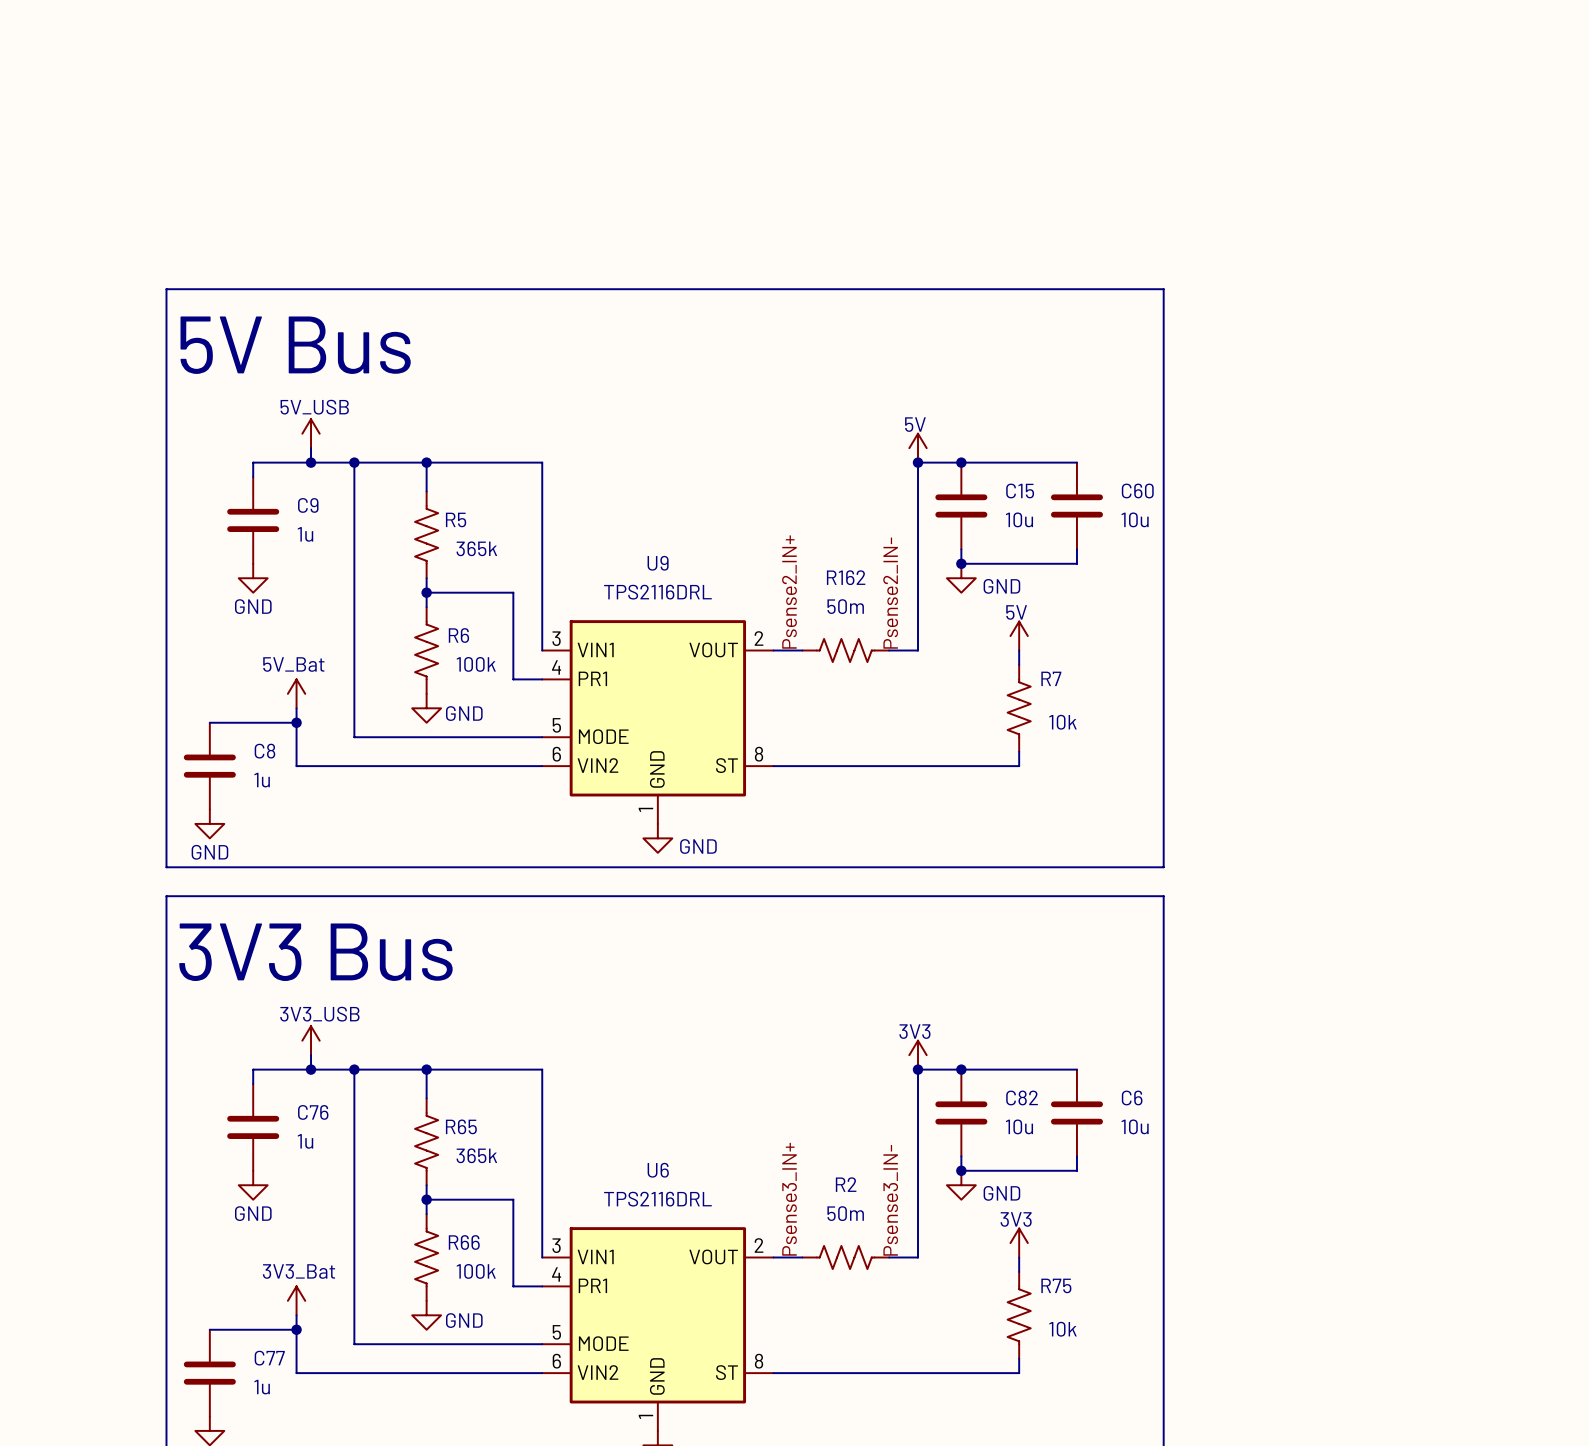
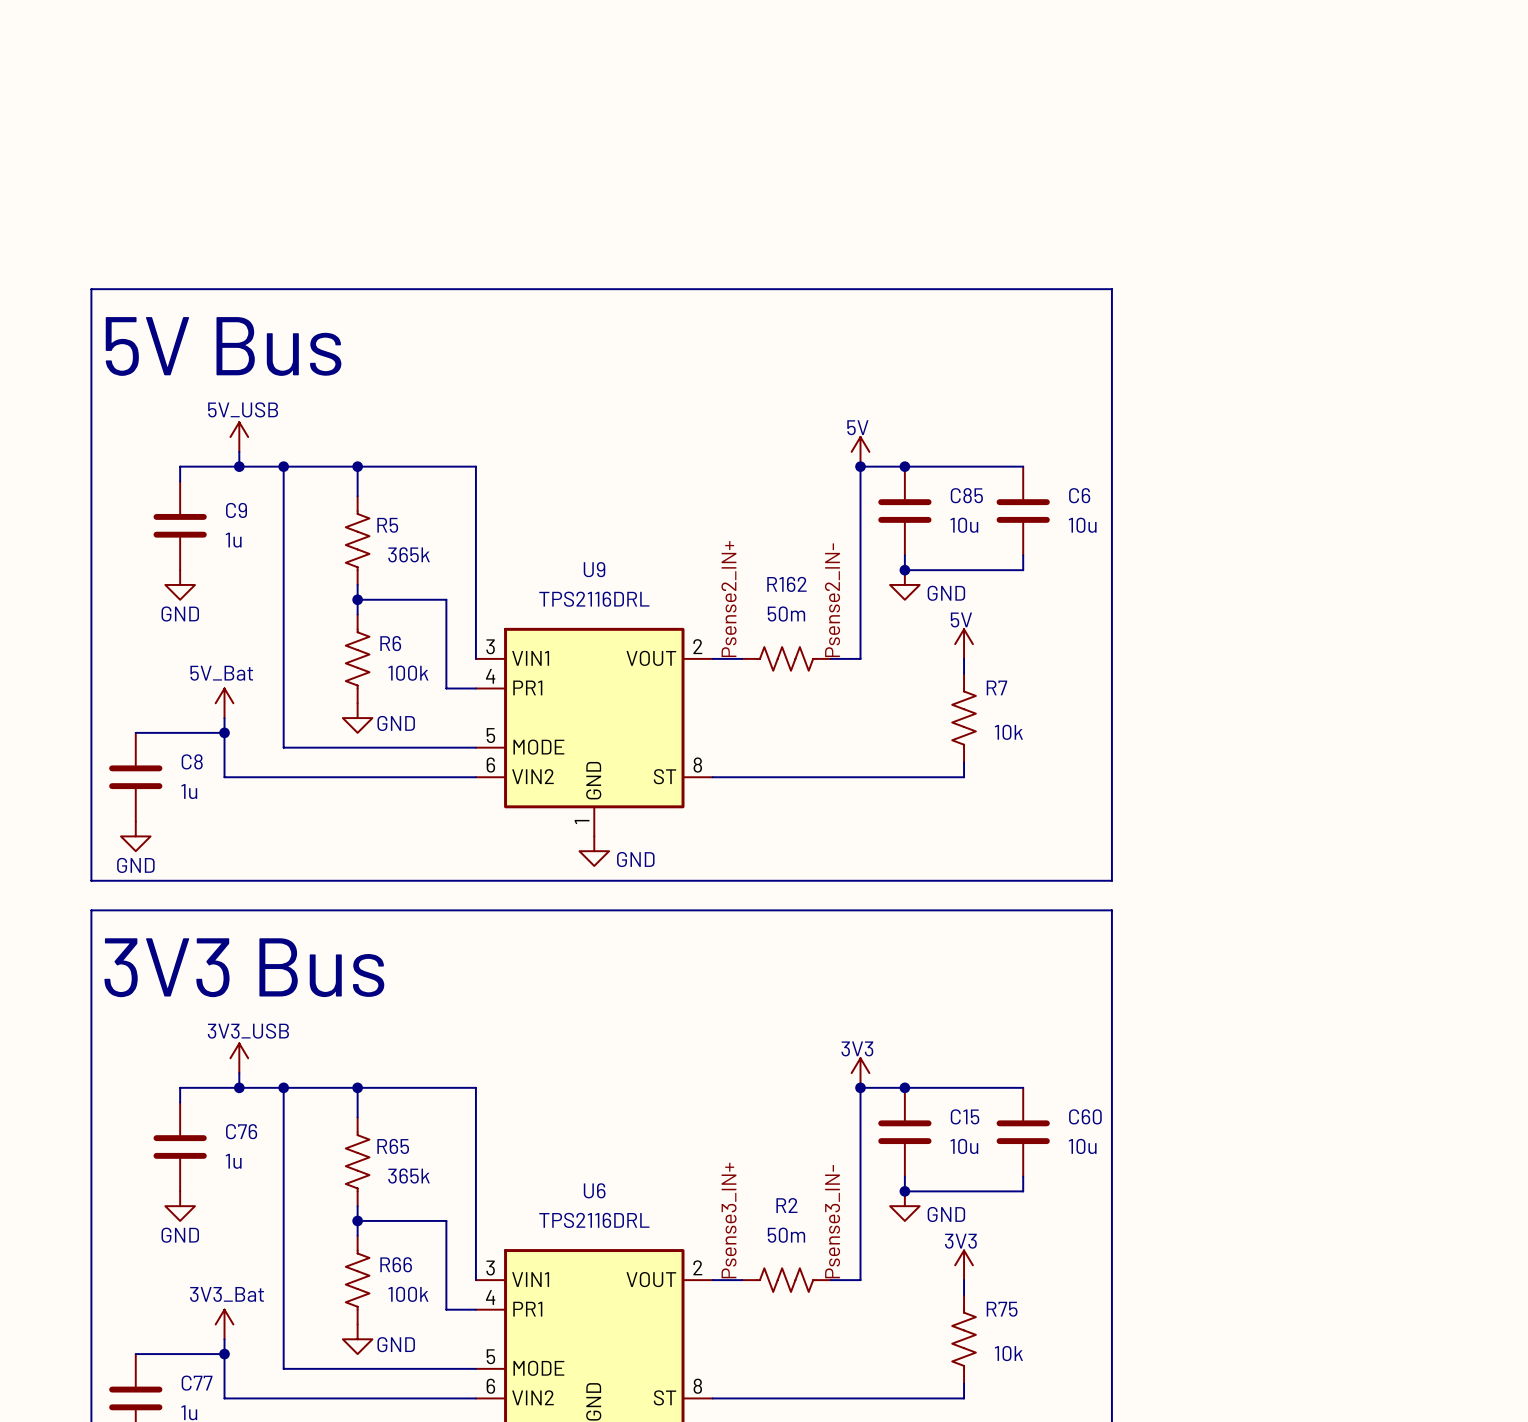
C15 name: C15 (1020, 491) -> C85 (966, 495)
C60 name: C60 (1137, 491) -> C6 (1079, 495)
C82 name: C82 (1022, 1097) -> C15 (965, 1116)
C6 name: C6 (1132, 1097) -> C60 (1085, 1116)

